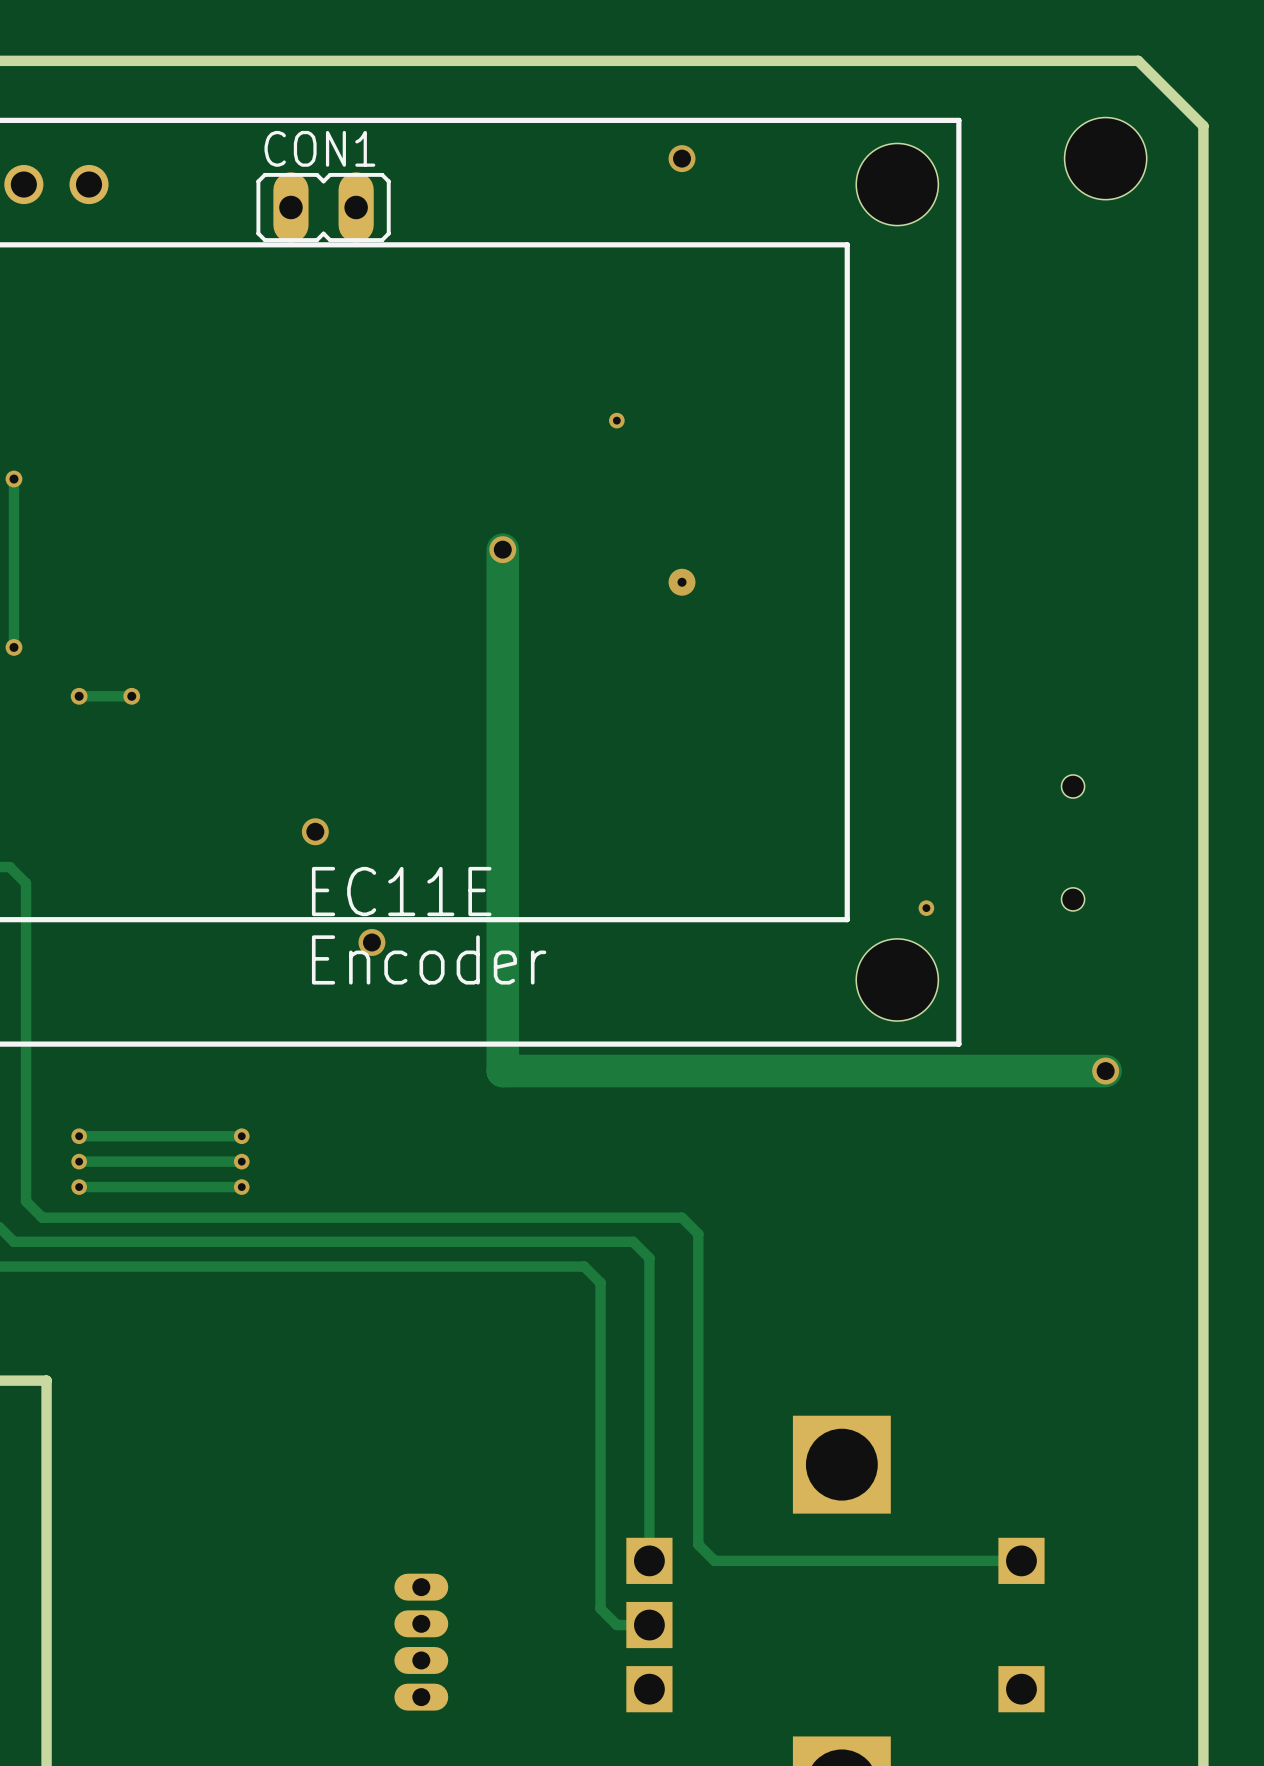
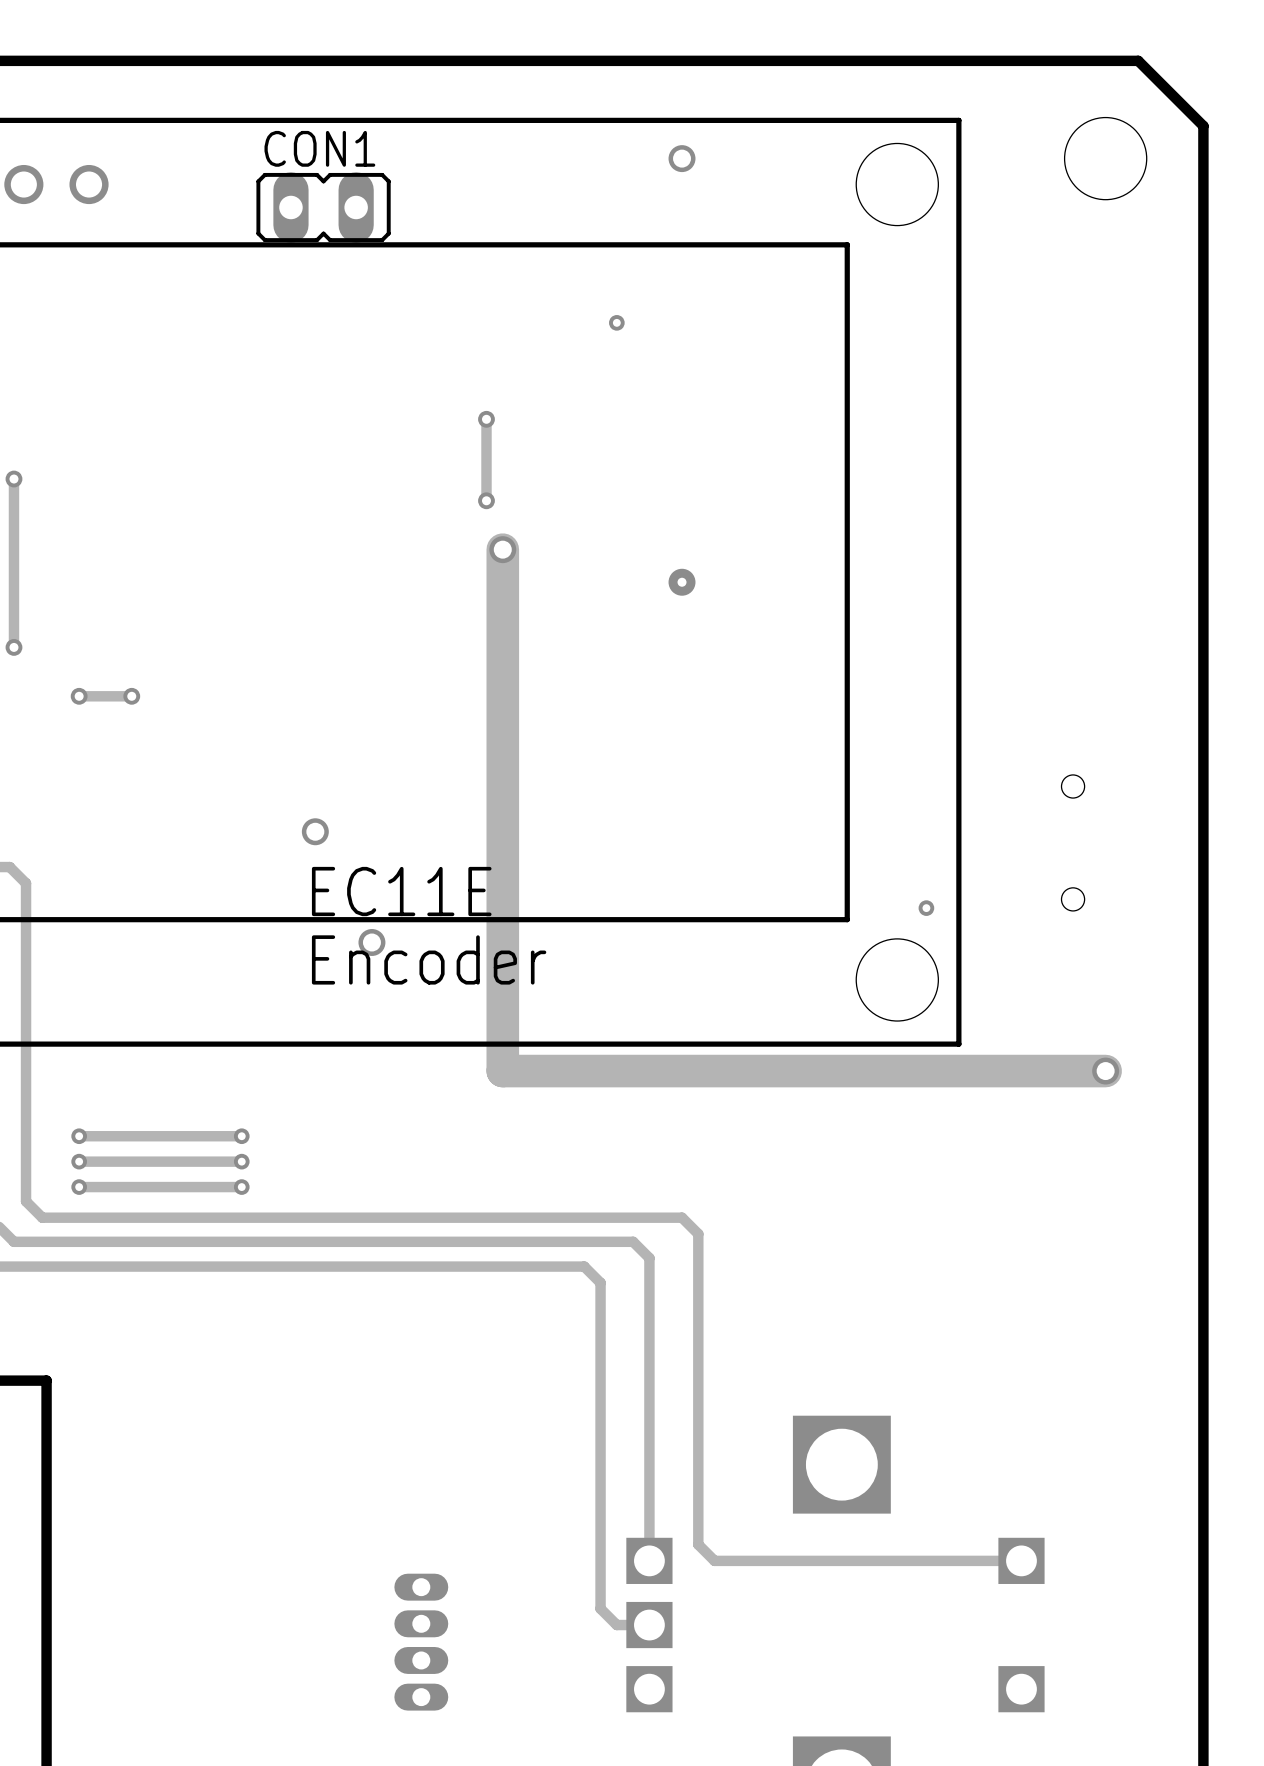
track: none -> (486, 419) (486, 500)
via: none -> (486, 419)
via position: (616, 420) -> (616, 322)
via: none -> (486, 500)

